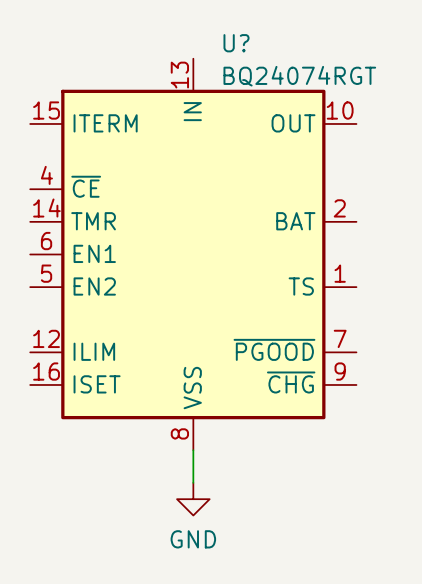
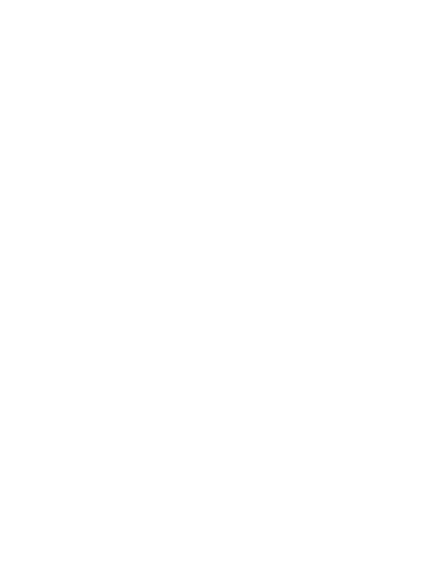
U?: BQ24074RGT (193, 254) -> none
wire: (193, 450) (193, 482) -> none
power symbol: GND (193, 499) -> none

